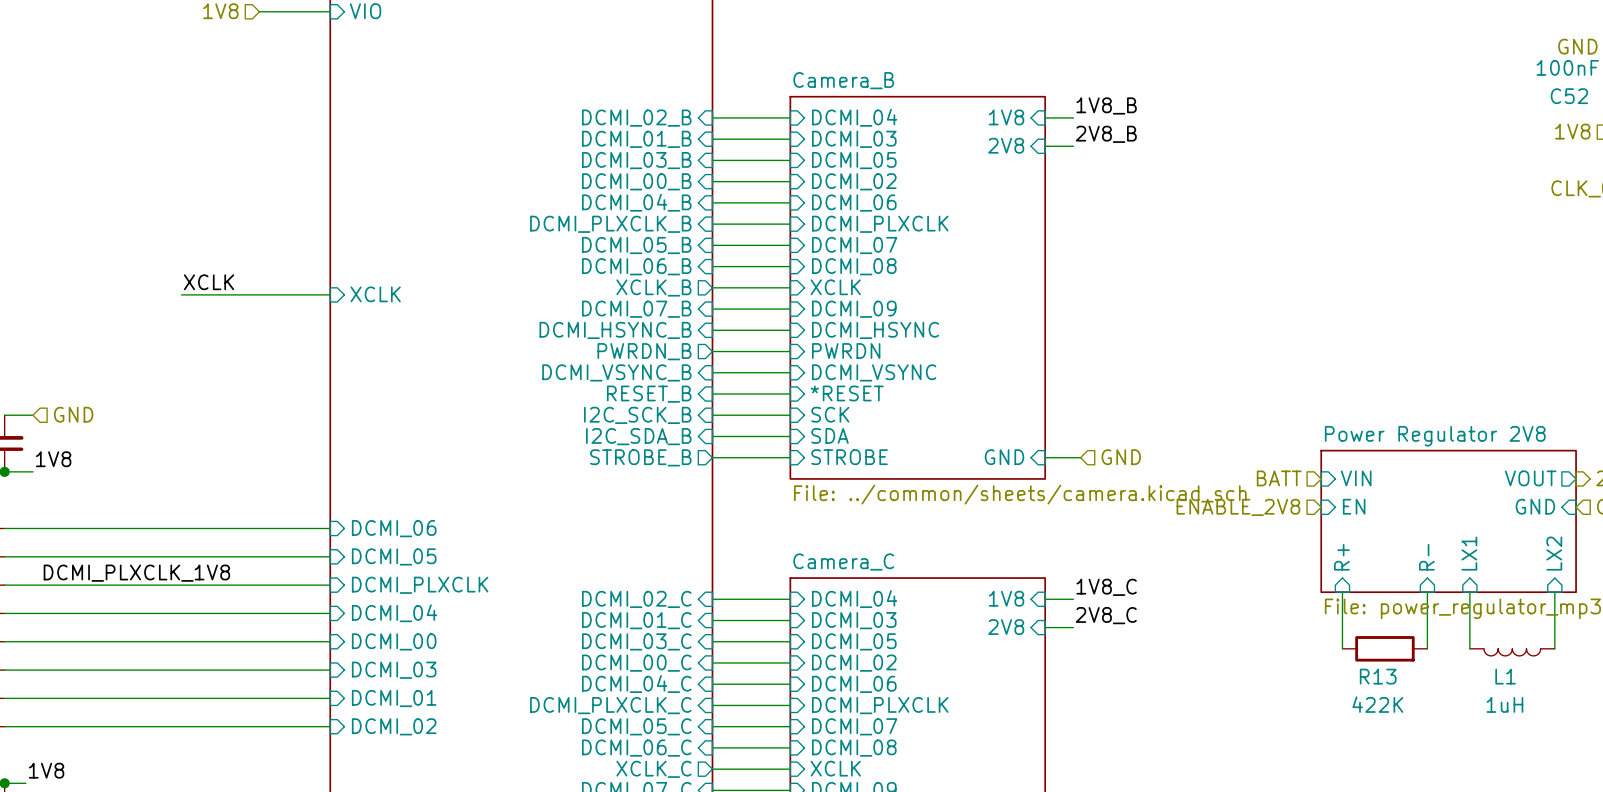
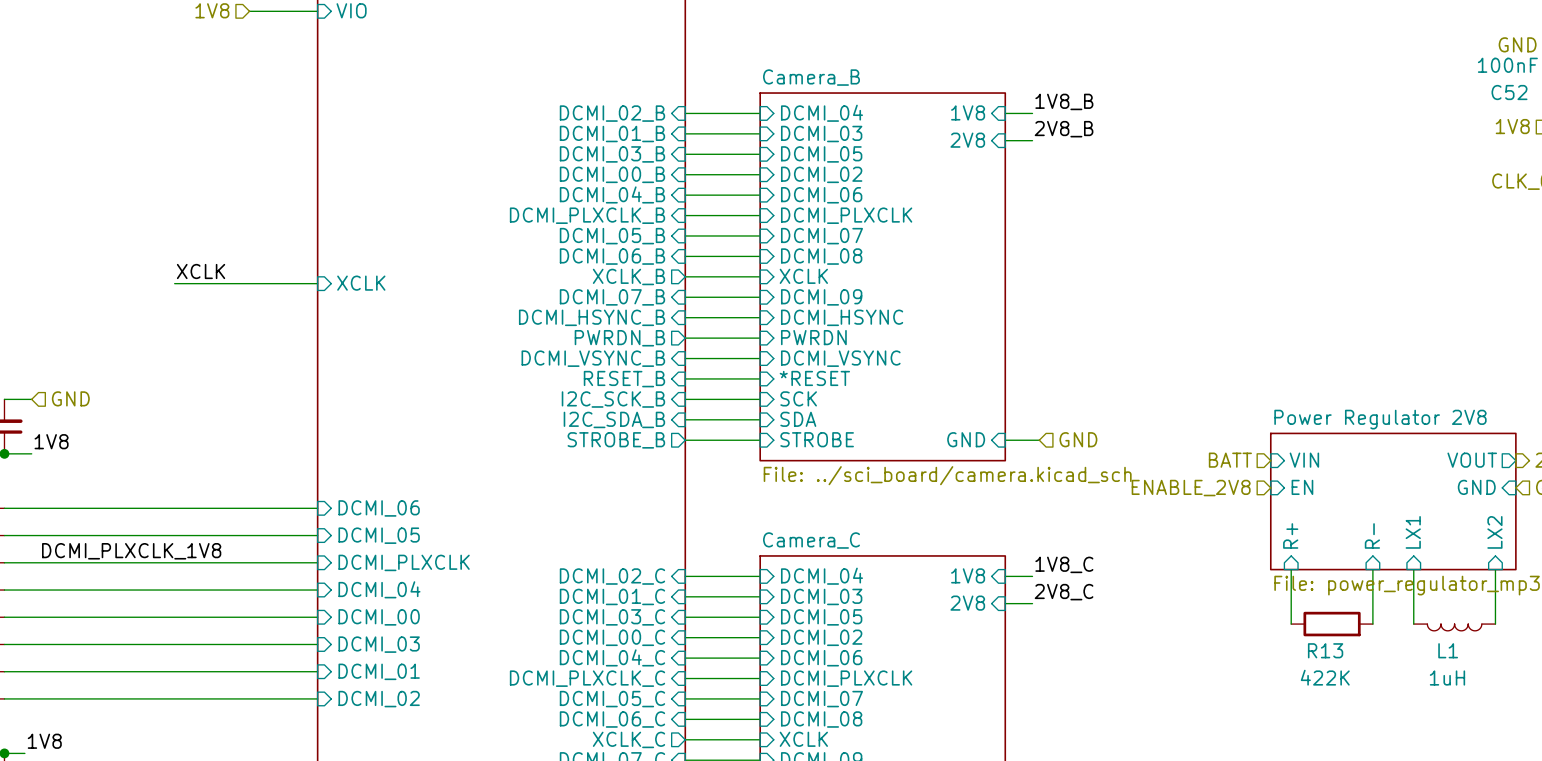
sheet Camera_B value: File: ../common/sheets/camera.kicad_sch (1020, 494) -> File: ../sci_board/camera.kicad_sch (947, 475)

